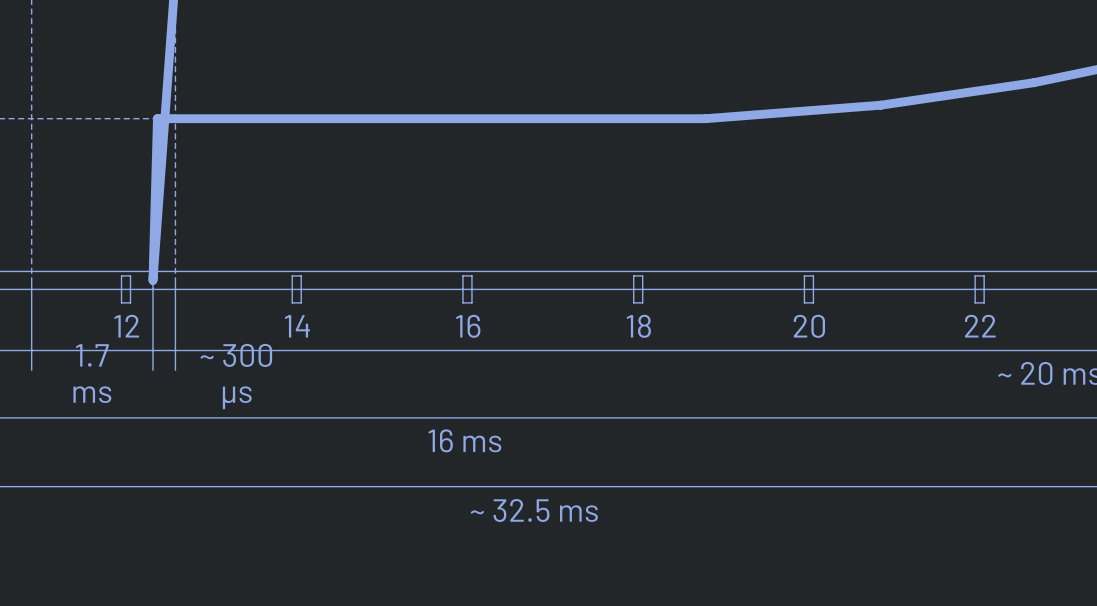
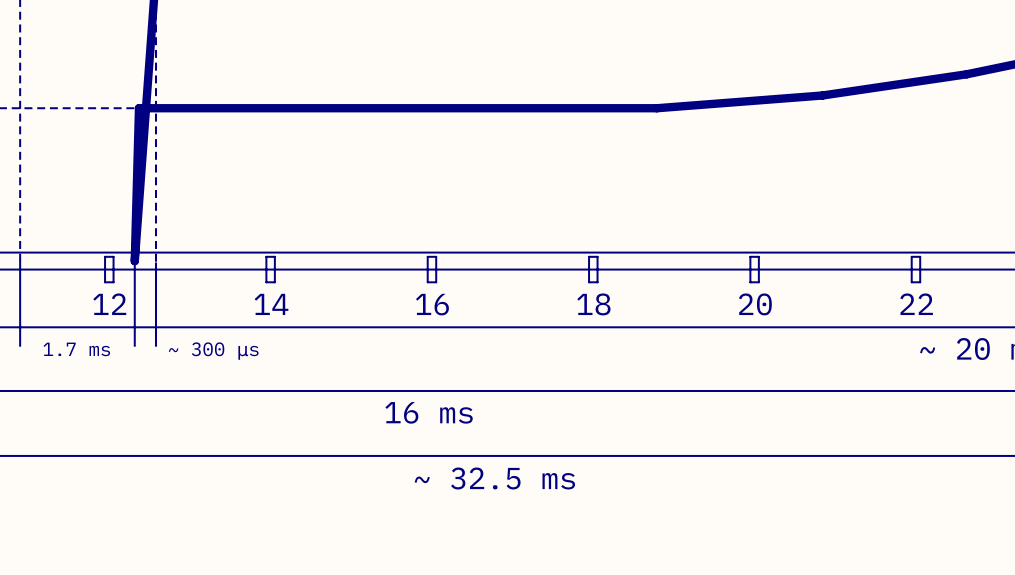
text: 1.7 (92, 355) -> 1.7 ms (76, 349)
text: ~ 300 (236, 355) -> ~ 300 μs (213, 351)
text: ms (92, 394) -> none
text: μs (237, 397) -> none

